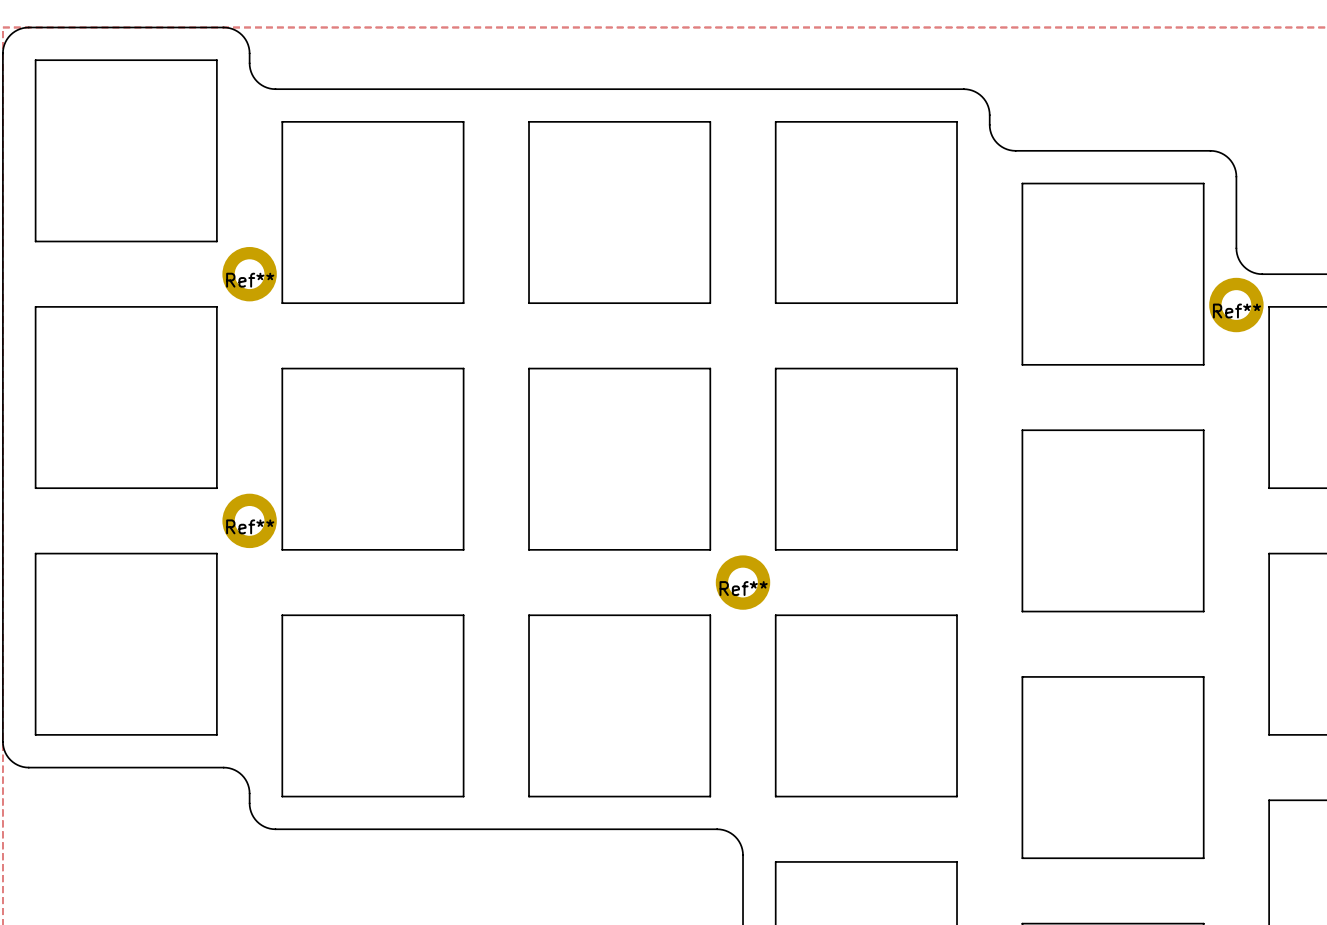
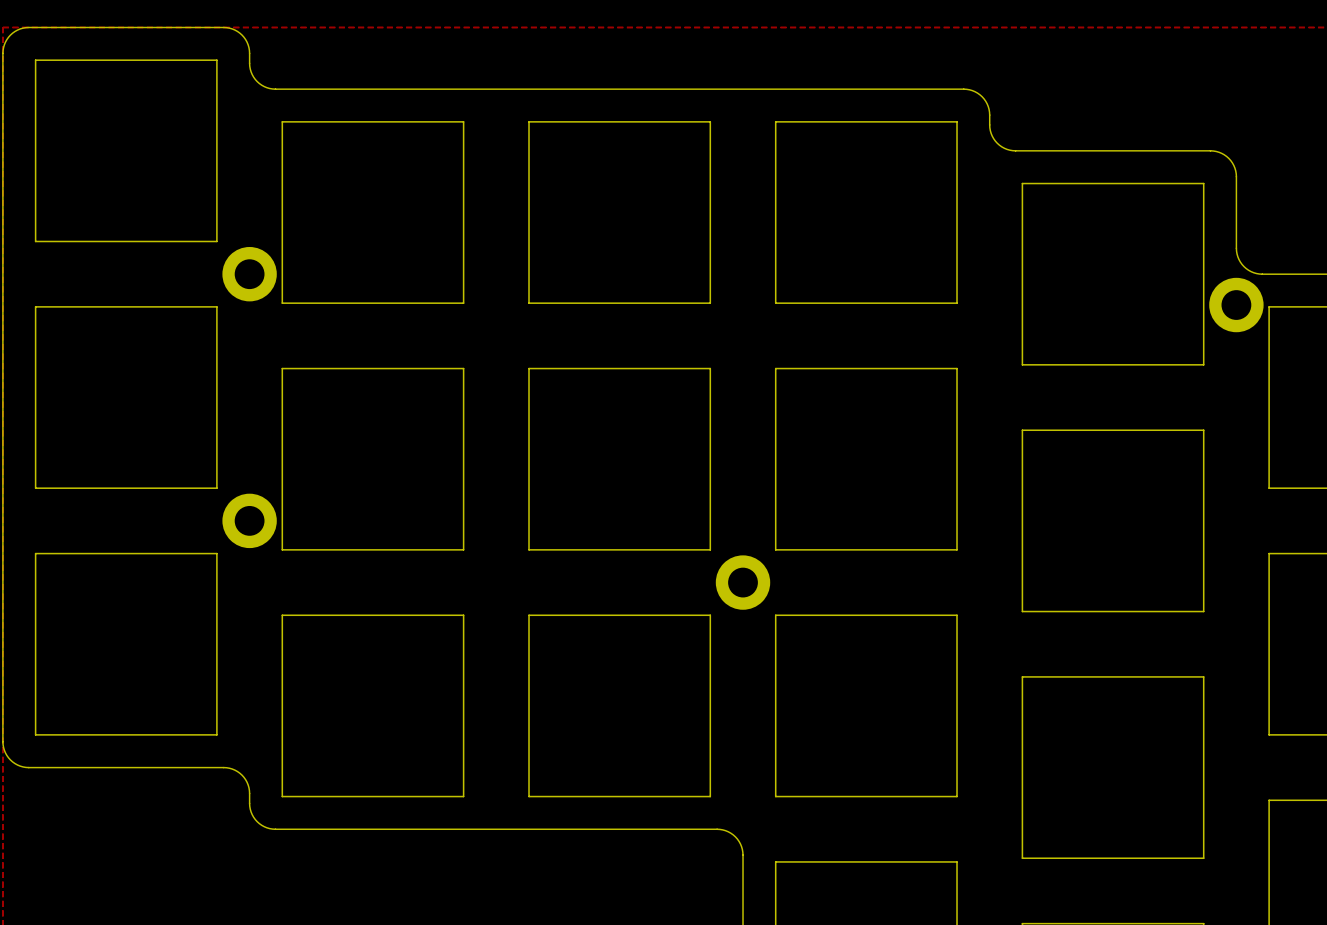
Ref** name: Ref** (250, 280) -> none
Ref** name: Ref** (1237, 311) -> none
Ref** name: Ref** (250, 526) -> none
Ref** name: Ref** (743, 588) -> none

